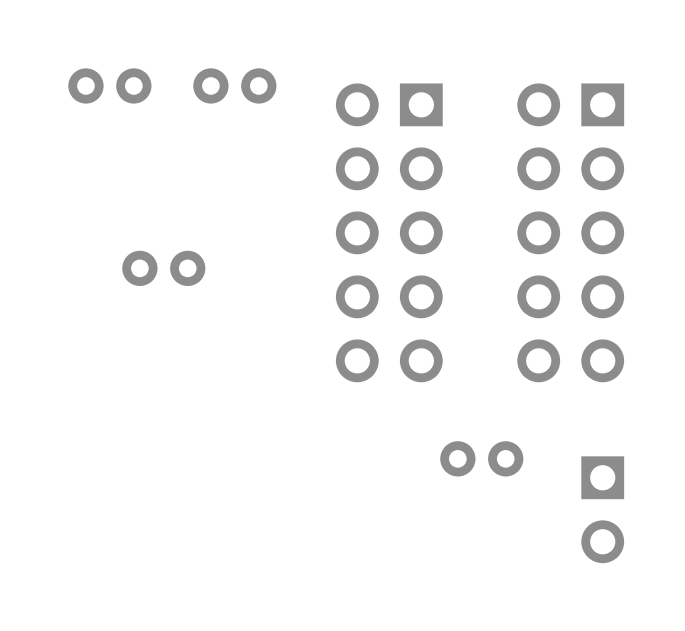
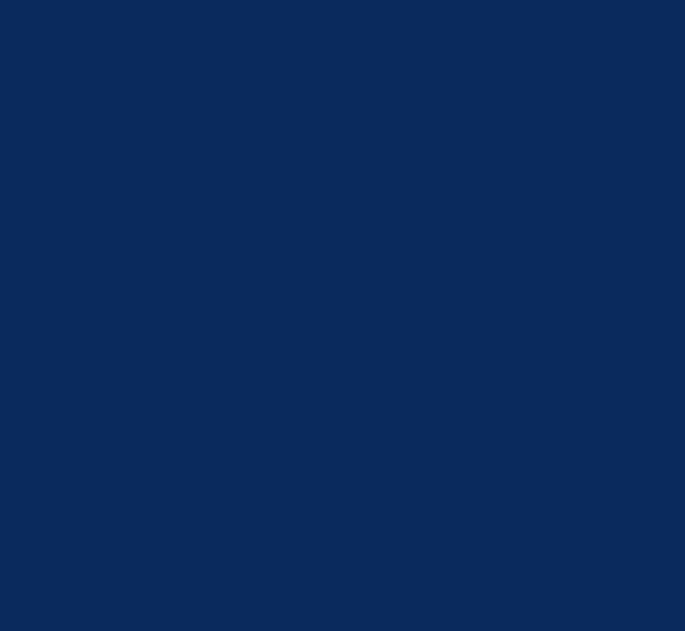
part: (109, 85) -> none
part: (234, 85) -> none
part: (389, 232) -> none
part: (570, 232) -> none
part: (163, 268) -> none
part: (481, 458) -> none
part: (602, 509) -> none

